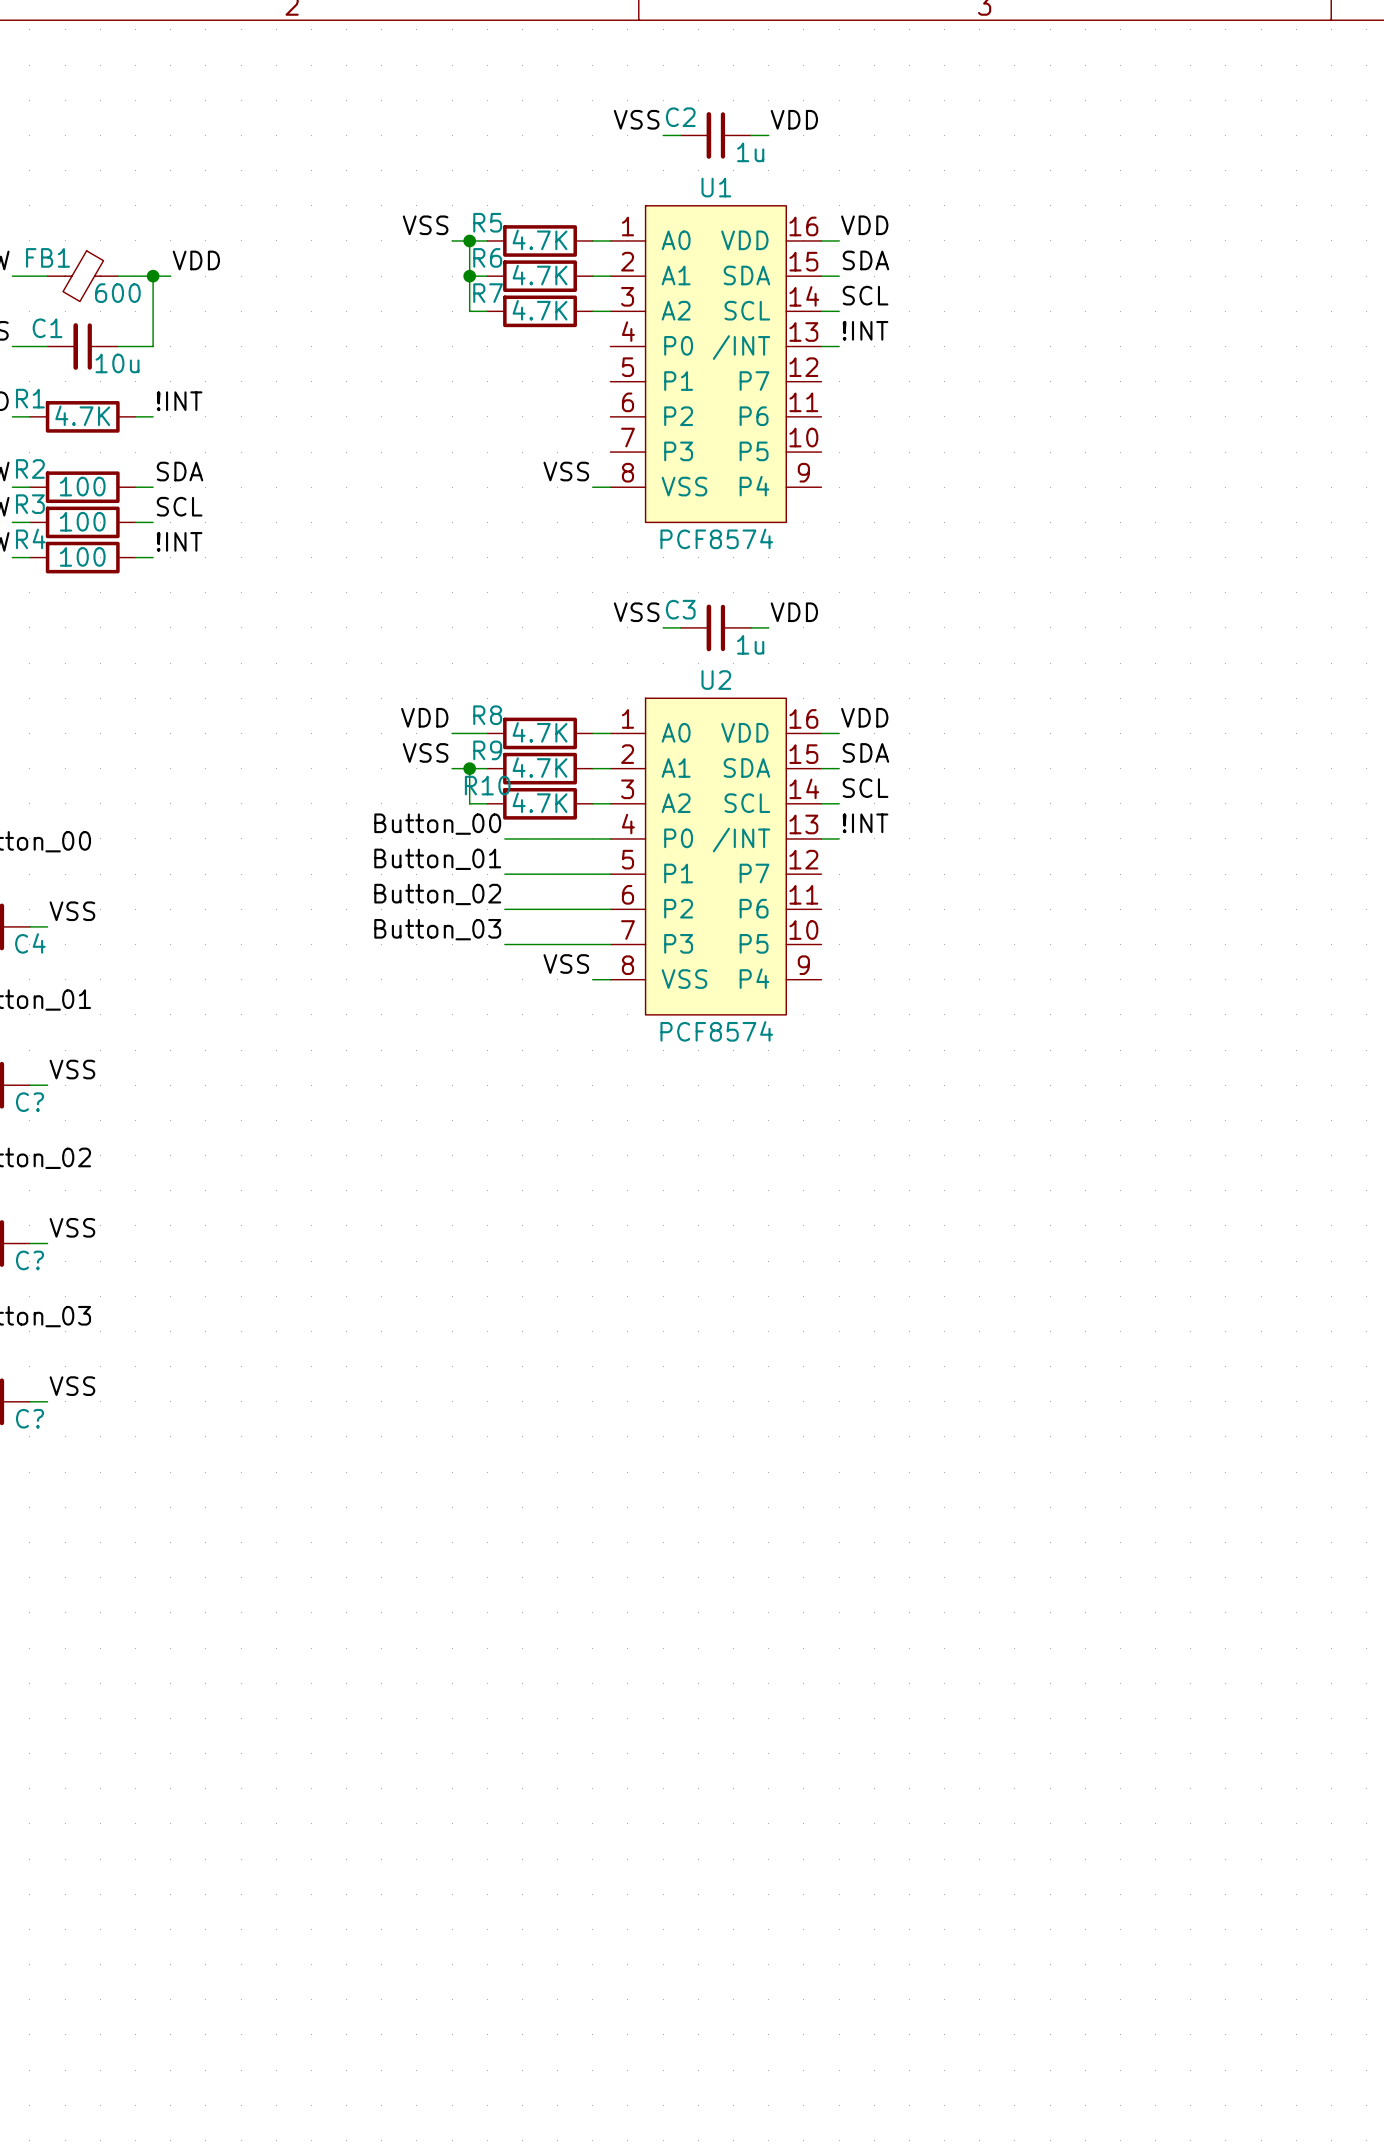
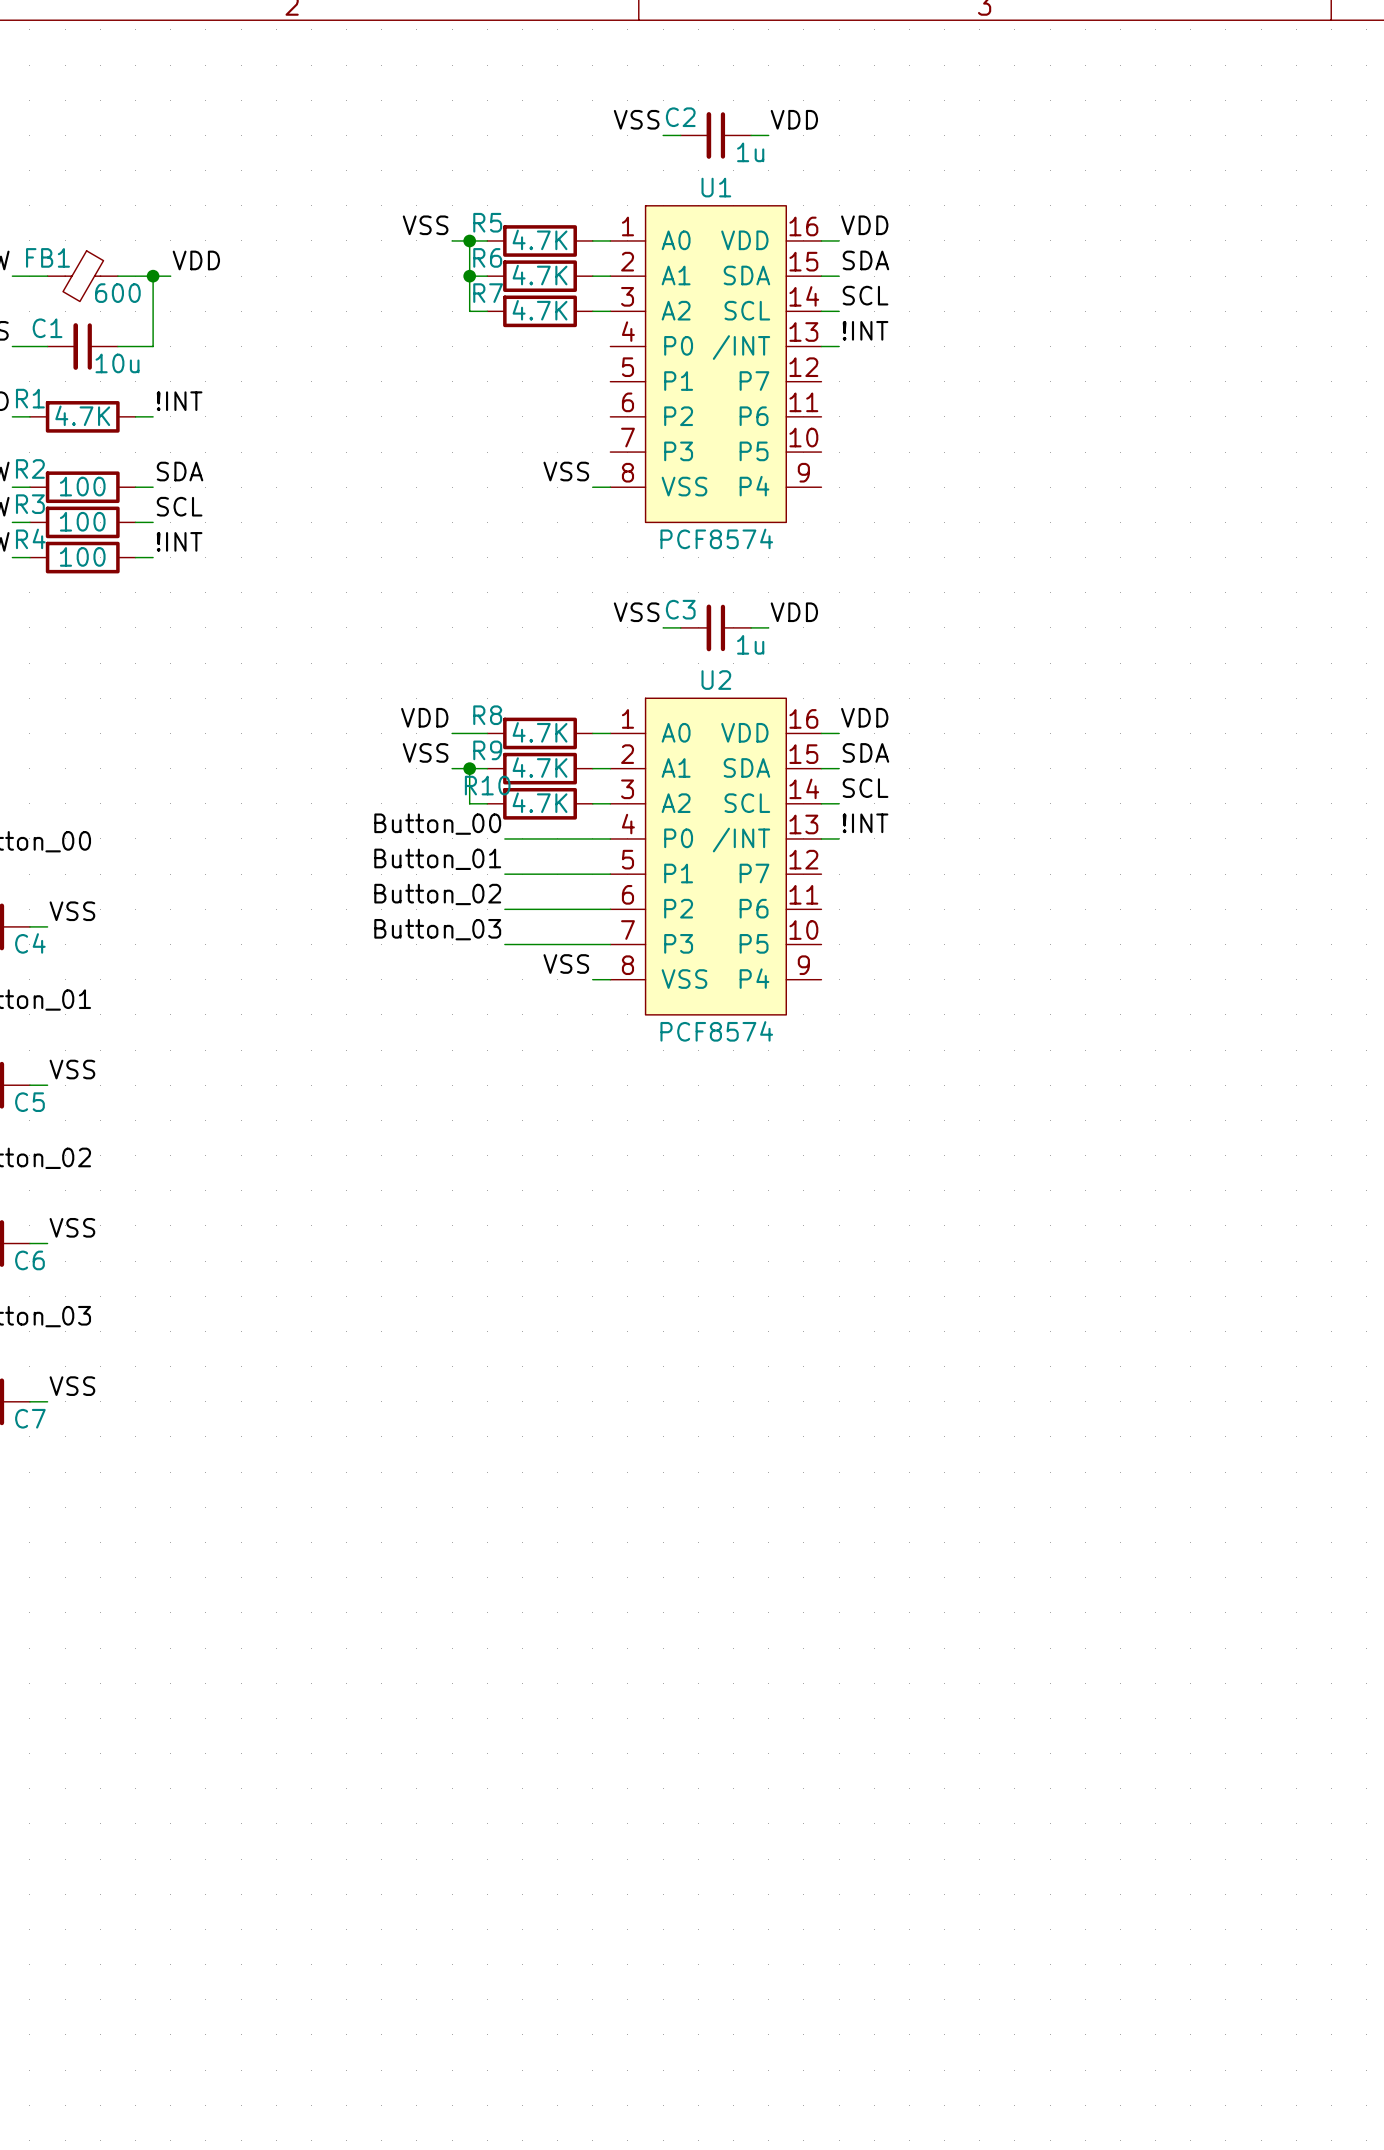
C? name: C? (29, 1102) -> C5 (29, 1102)
C? name: C? (29, 1260) -> C6 (29, 1260)
C? name: C? (29, 1418) -> C7 (30, 1418)

